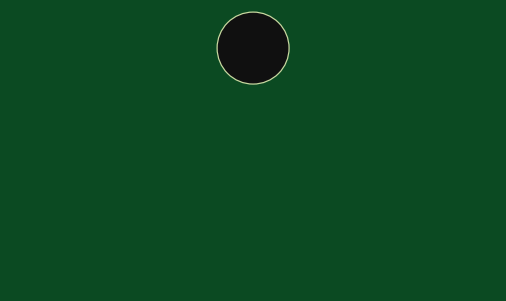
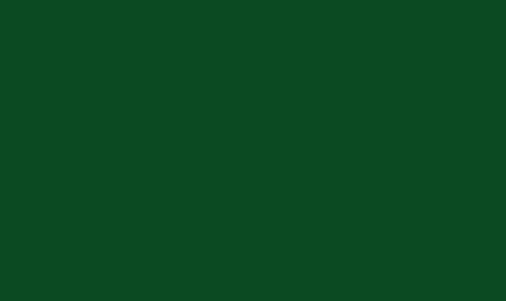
part: (253, 48) -> none

